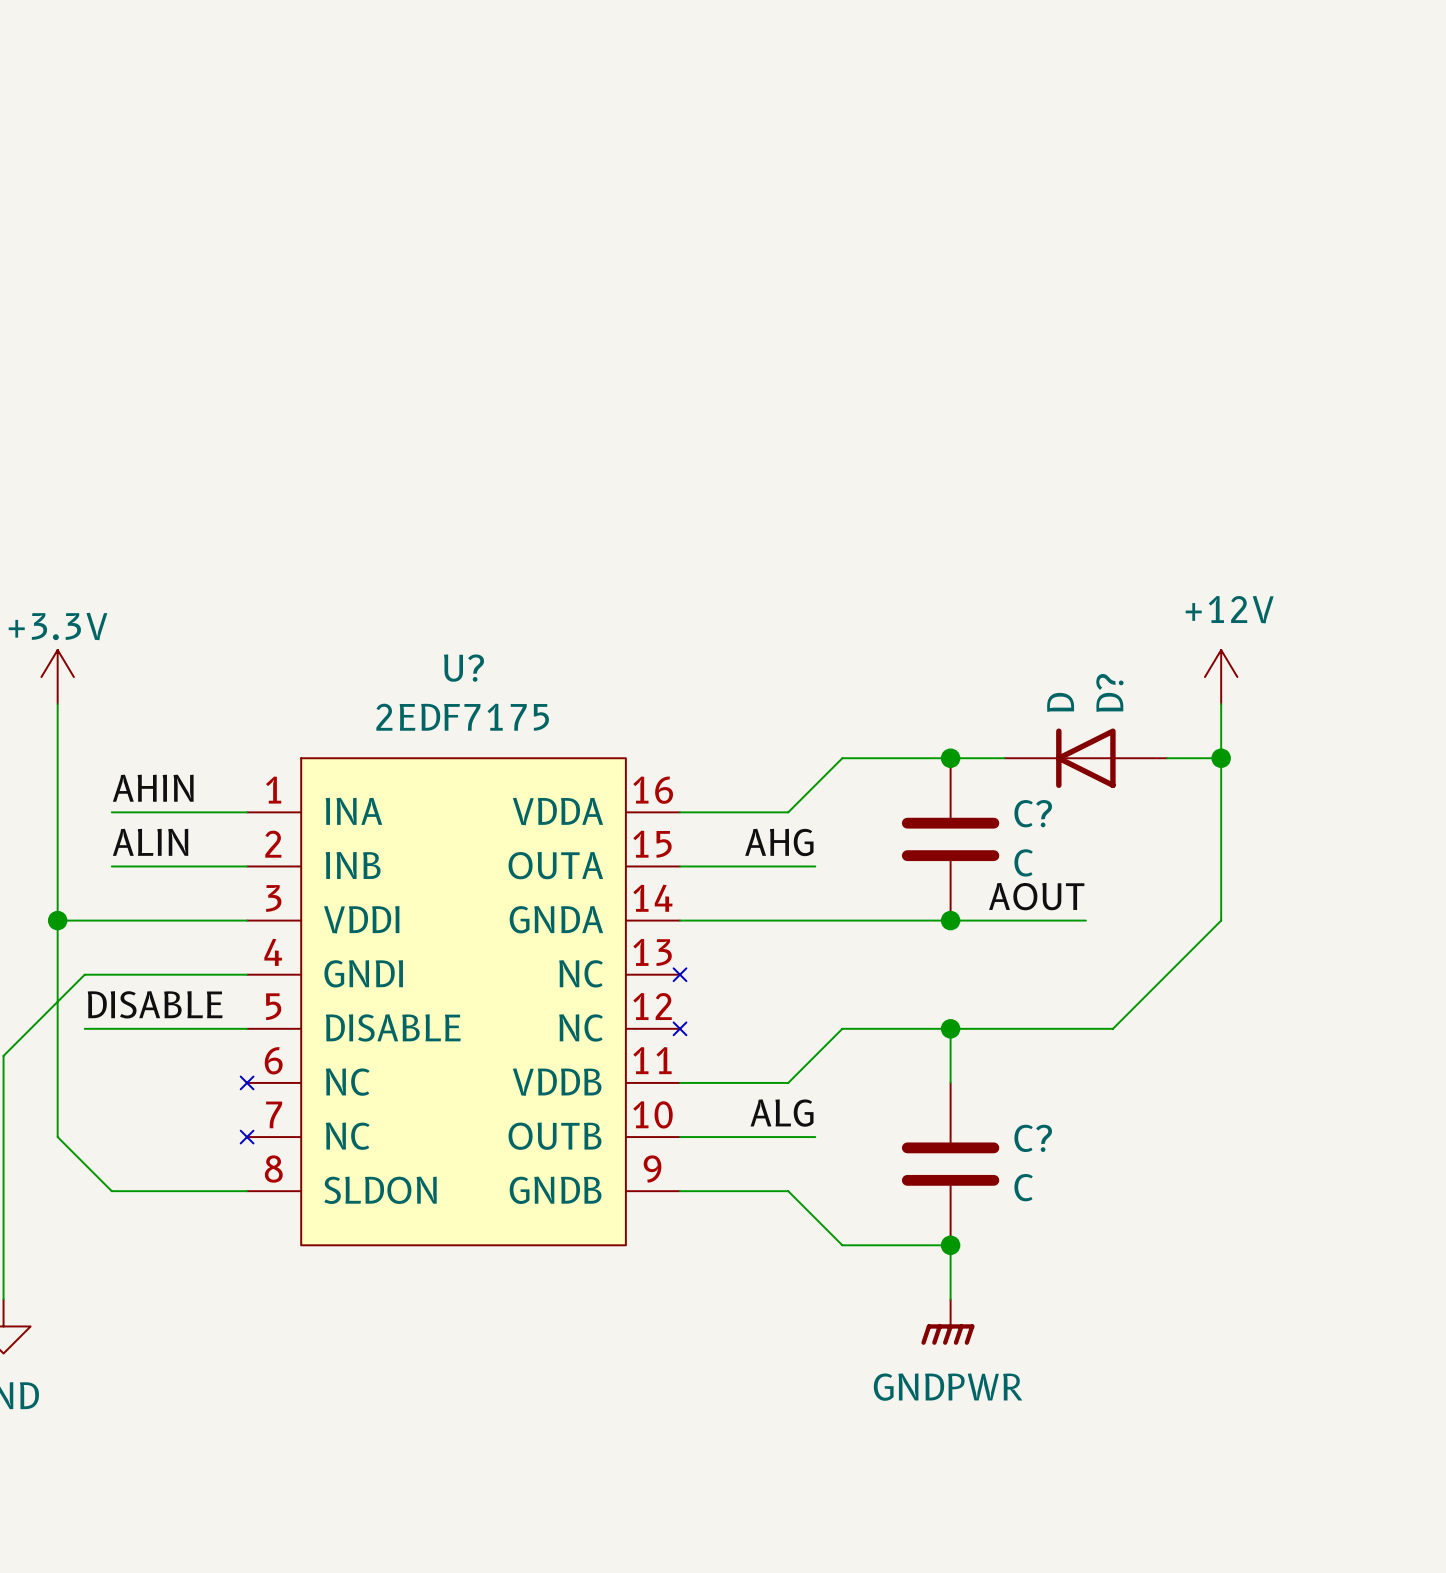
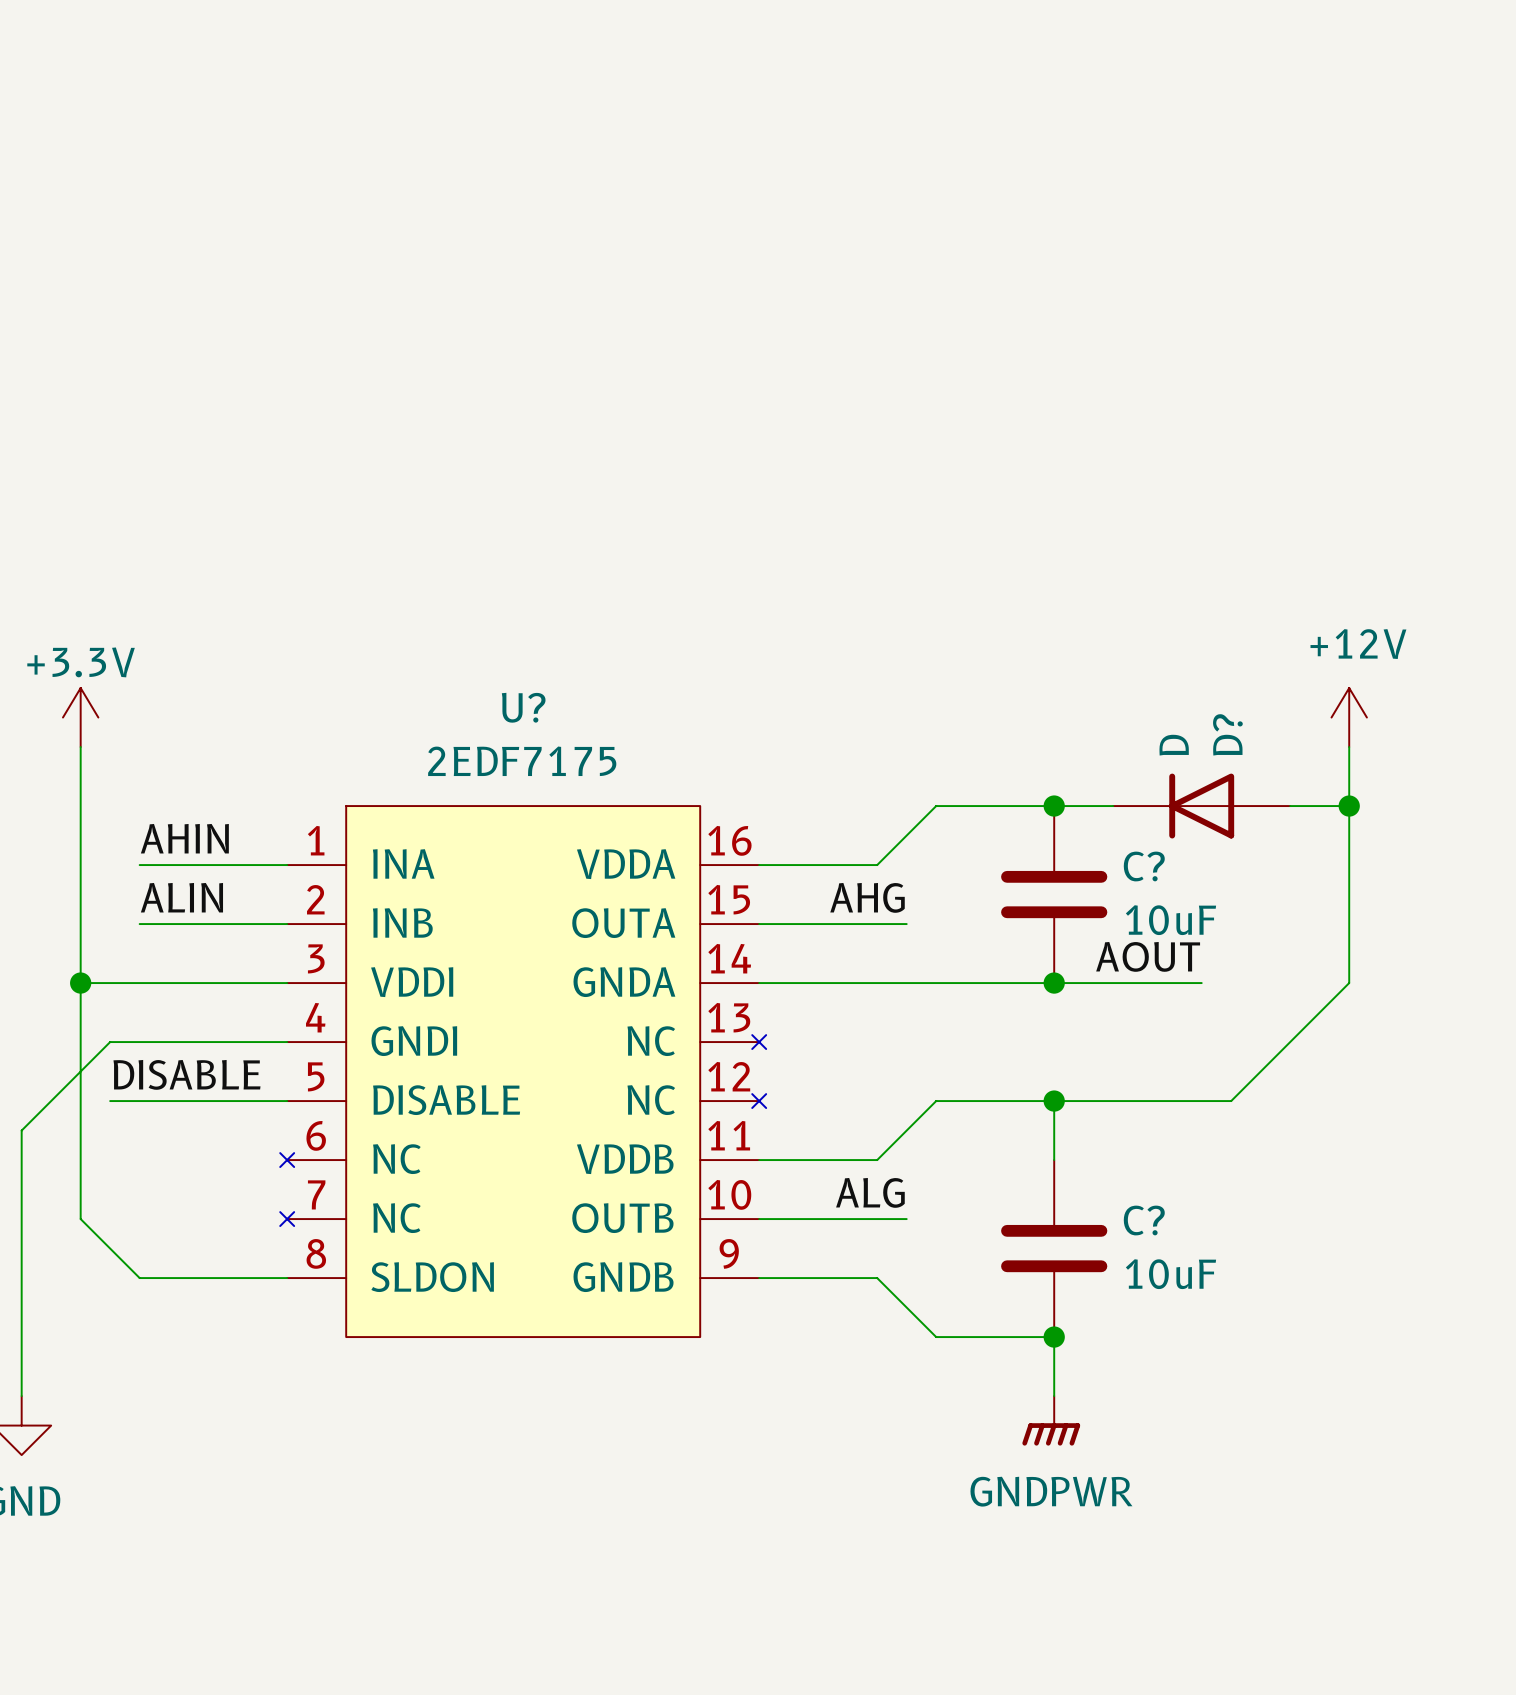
C? value: C (1023, 862) -> 10uF (1170, 920)
C? value: C (1023, 1187) -> 10uF (1170, 1274)

